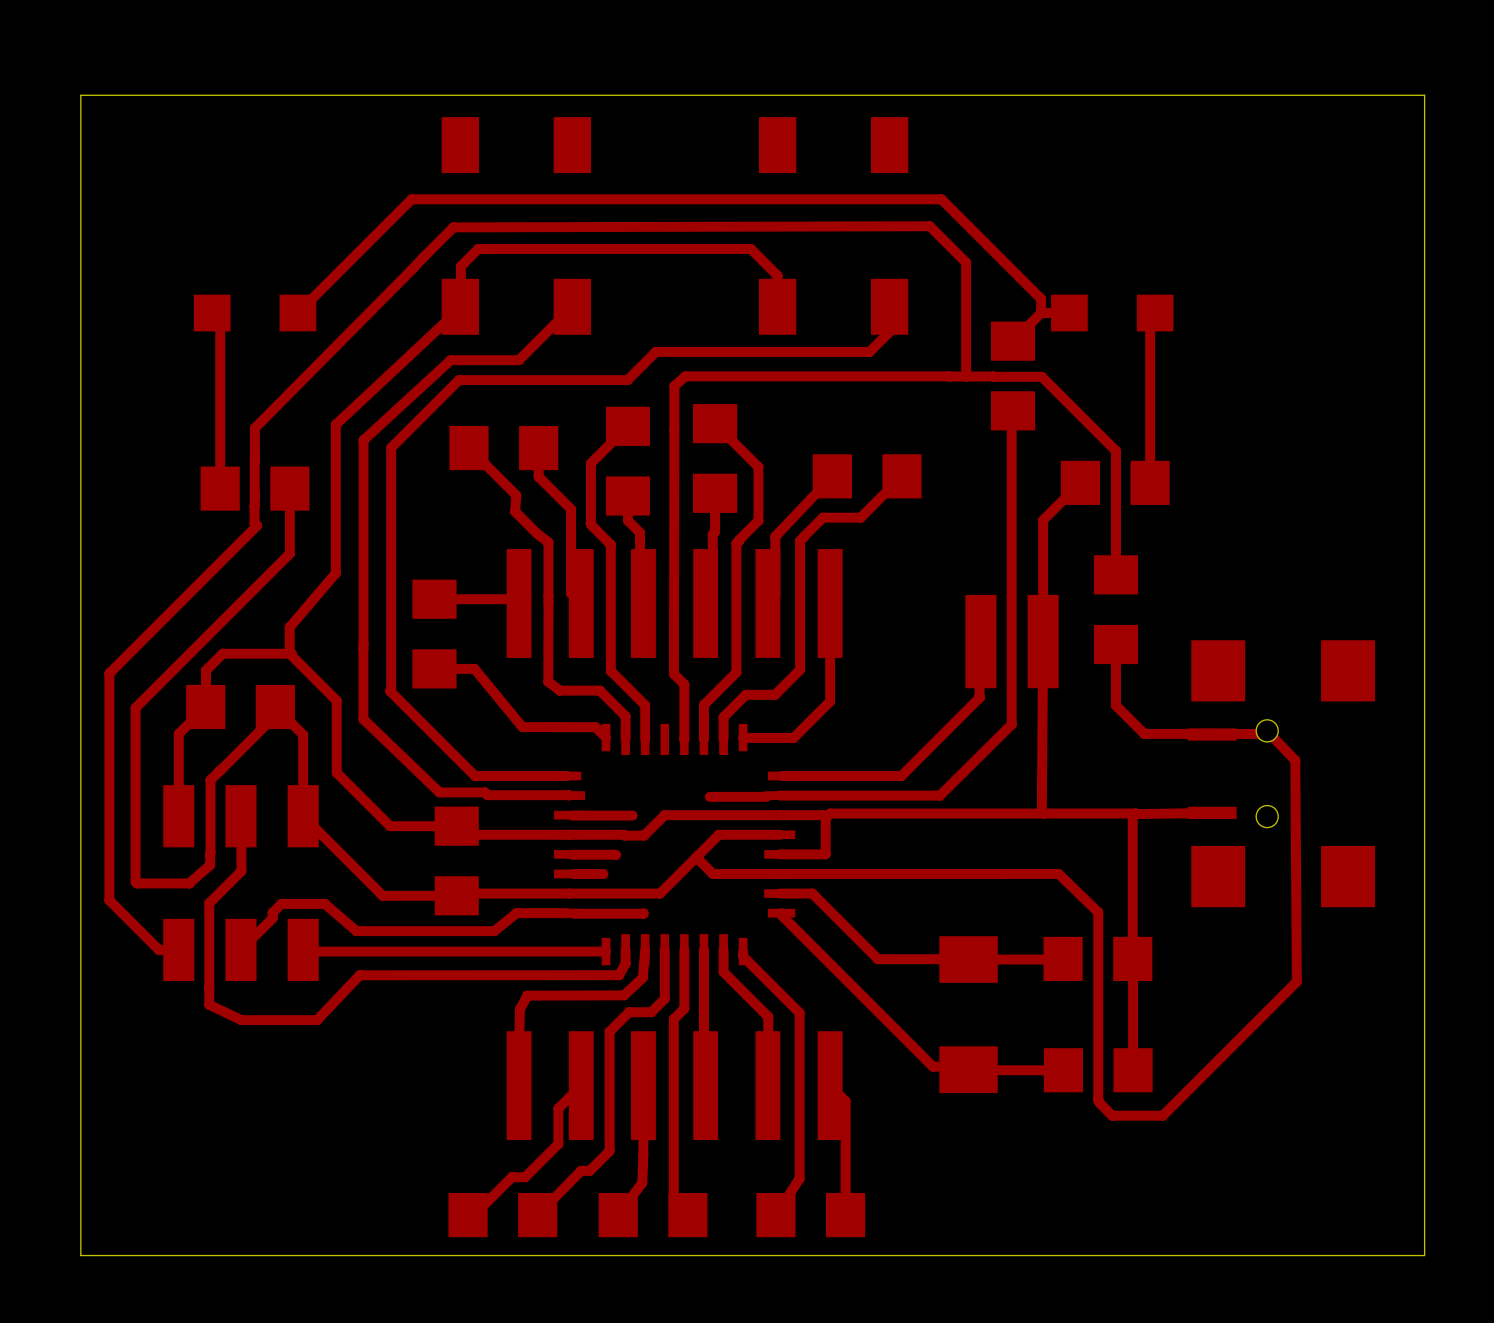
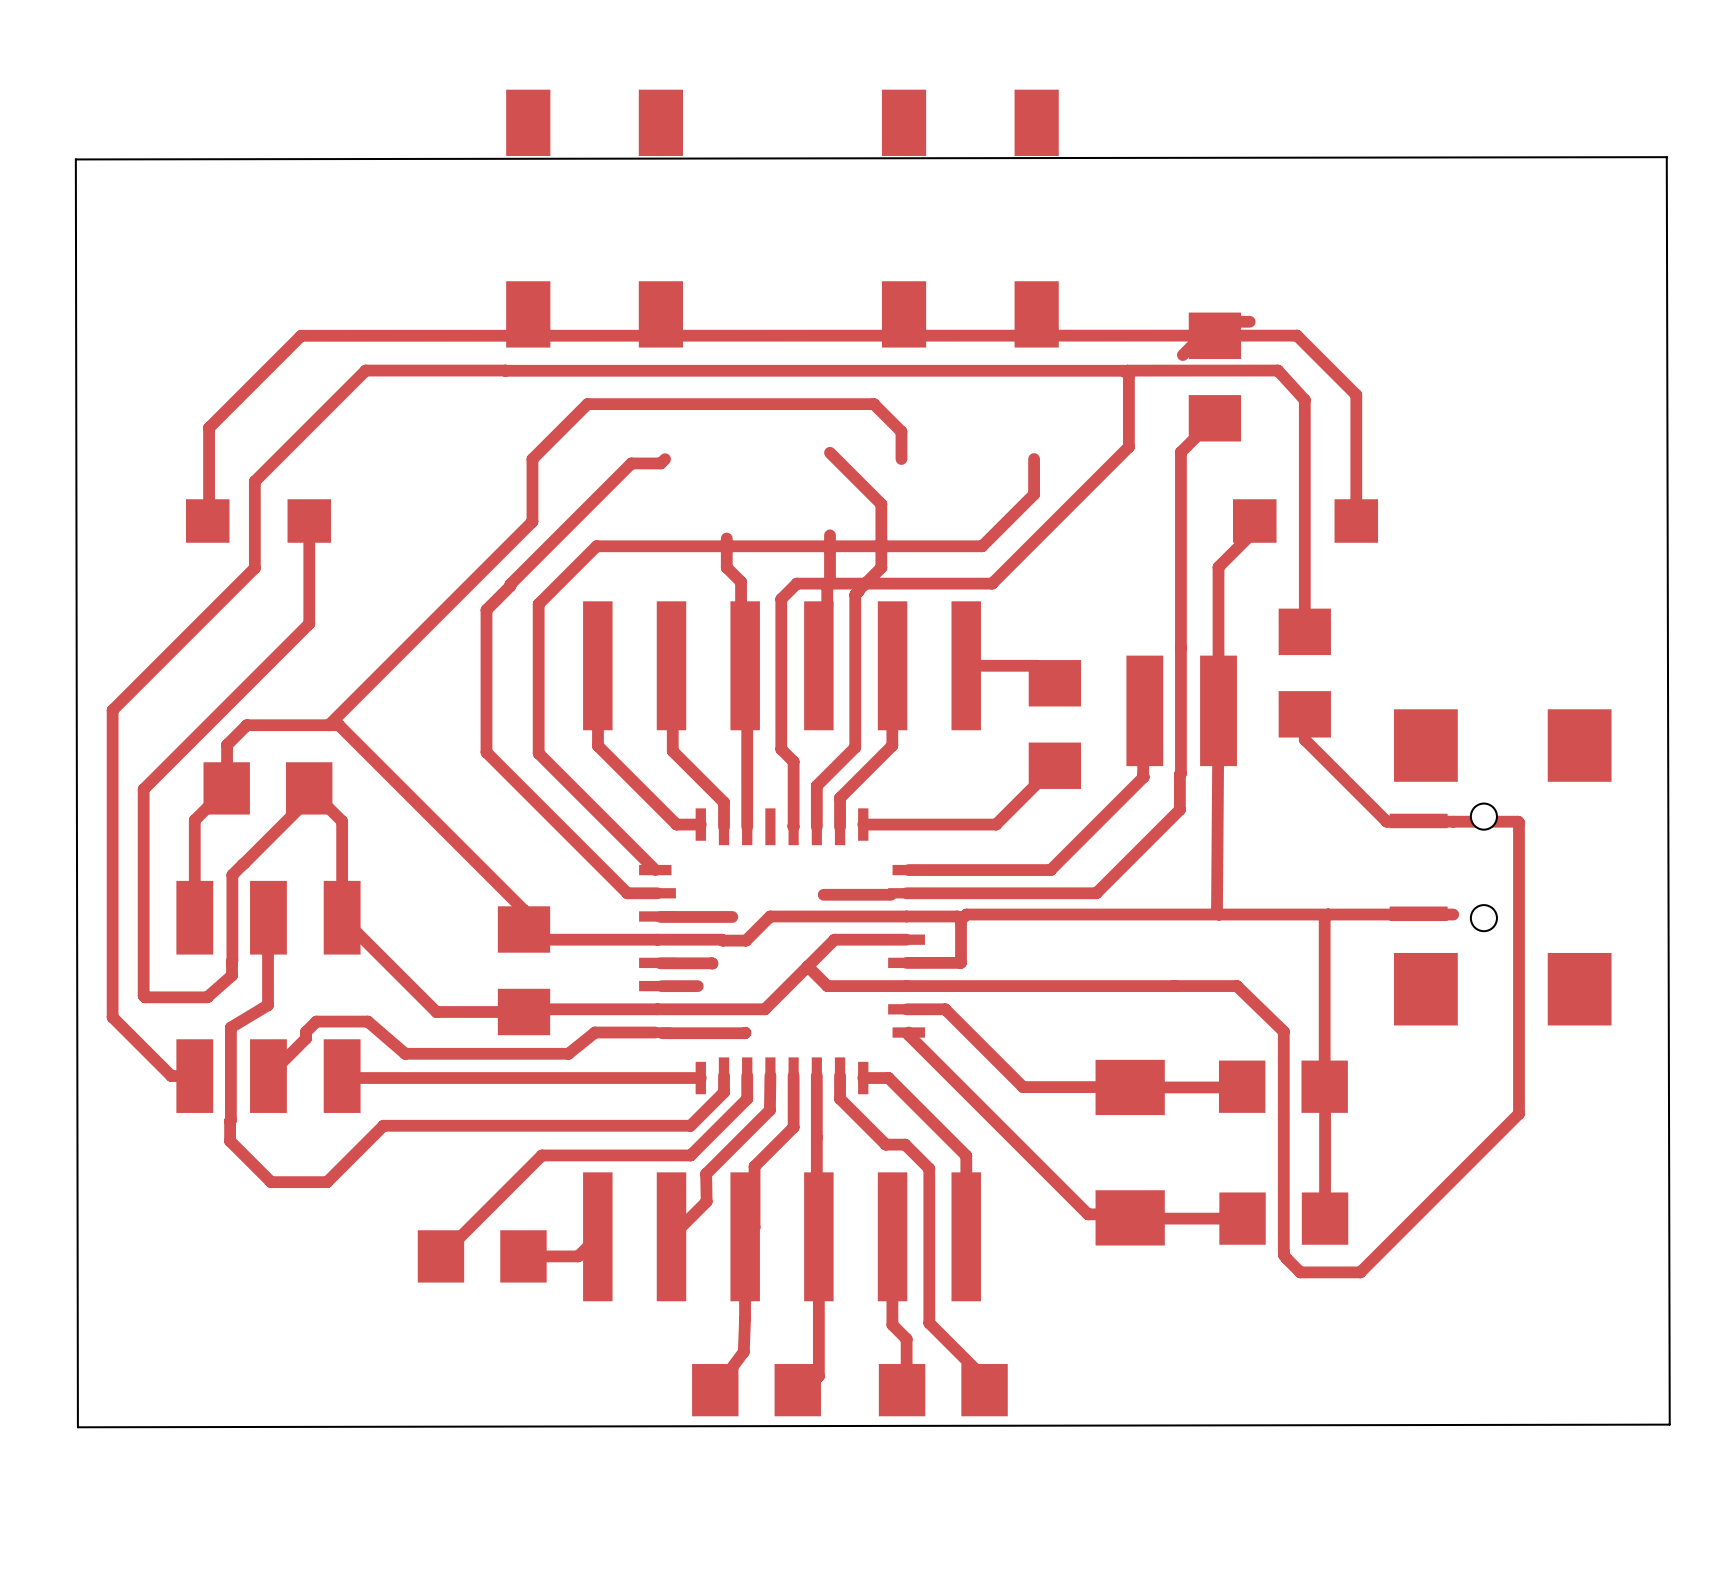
board edge: (1424, 95) (80, 95) (80, 1255) (1424, 1255) (1424, 95) -> (1666, 157) (1669, 1424) (77, 1427) (75, 159) (1666, 157)
top track: (572, 306) (518, 360) (450, 360) (363, 440) (363, 719) (439, 792) (484, 792) (487, 795) (569, 795) -> (665, 459) (660, 463) (631, 463) (486, 610) (486, 752) (627, 893) (657, 893)
top track: (777, 306) (777, 275) (750, 248) (478, 248) (460, 266) (460, 307) (458, 310) -> none
top track: (889, 306) (889, 331) (869, 351) (655, 351) (627, 380) (458, 380) (391, 447) (390, 691) (474, 775) (567, 775) -> (1034, 459) (1034, 494) (982, 546) (596, 546) (538, 604) (538, 753) (655, 870)
top track: (458, 310) (335, 424) (335, 573) (289, 627) (289, 653) (336, 700) (336, 772) (390, 826) (456, 826) (458, 821) -> none
top track: (212, 313) (220, 321) (220, 488) (207, 477) -> none
part: (255, 313) -> none
top track: (1041, 313) (1041, 298) (941, 199) (411, 199) (297, 313) -> none
part: (1112, 313) -> none
top track: (1155, 313) (1150, 318) (1150, 482) -> none
top track: none -> (505, 370) (1124, 370) (1128, 375)
top track: (966, 376) (966, 262) (929, 226) (453, 227) (254, 428) (254, 506) -> none
top track: (993, 376) (685, 376) (674, 386) (673, 674) -> (1128, 375) (1128, 446) (992, 583) (796, 583) (781, 599) (781, 749)
top track: (993, 376) (1041, 376) (1115, 450) -> (1128, 375) (1127, 370) (1277, 370) (1304, 400) (1304, 485)
part position: (1013, 376) -> (1214, 377)
top track: (1013, 410) (1011, 724) (940, 795) -> (1214, 418) (1180, 452) (1179, 809) (1096, 893)
top track: (627, 426) (590, 463) (590, 523) (610, 544) (610, 670) (645, 705) -> (745, 665) (747, 667) (747, 786)
top track: none -> (901, 459) (901, 431) (873, 404) (587, 404) (532, 459) (532, 521) (328, 725) (338, 725) (523, 910) (523, 929)
top track: (468, 448) (516, 495) (515, 511) (548, 542) (548, 681) (559, 690) (599, 690) (625, 716) (625, 718) -> (671, 665) (672, 751) (724, 802)
part: (503, 448) -> none
top track: (538, 448) (538, 476) (571, 509) (571, 593) (581, 603) -> none
part: (715, 458) -> none
part footprint: [1060, 460, 1170, 505] -> [1233, 499, 1379, 543]
part: (627, 461) -> none
part footprint: [200, 466, 310, 511] -> [185, 499, 332, 543]
top track: (832, 476) (775, 536) (775, 596) (767, 603) -> none
part: (867, 476) -> none
top track: (902, 476) (860, 517) (822, 517) (800, 540) (800, 669) (775, 694) (745, 694) (723, 717) -> (892, 666) (892, 745) (840, 797) (840, 800)
top track: none -> (1356, 520) (1356, 394) (1296, 335) (301, 335) (209, 427) (207, 520)
top track: (275, 497) (289, 488) (289, 553) (275, 568) -> (309, 520) (309, 623)
top track: (254, 506) (254, 523) (257, 525) (109, 673) -> (505, 370) (365, 370) (254, 481) (254, 568) (112, 710) (112, 748)
top track: (434, 599) (514, 599) (519, 603) -> none
top track: (830, 603) (830, 701) (793, 737) (743, 737) -> (1054, 765) (996, 824) (863, 824)
top track: none -> (966, 665) (1037, 665) (1054, 683)
part: (434, 634) -> none
part: none -> (1054, 724)
top track: (1115, 665) (1115, 705) (1144, 733) (1270, 733) (1295, 760) -> none
top track: (434, 668) (474, 668) (522, 727) (595, 727) (606, 737) -> (597, 665) (597, 745) (676, 824) (700, 824)
top track: (1295, 760) (1296, 981) -> (1304, 739) (1386, 821) (1518, 822) (1518, 1113)
top track: (1212, 812) (1135, 813) -> (1453, 914) (1328, 914)
top track: (240, 816) (241, 871) (209, 903) (209, 908) -> (268, 917) (268, 1005) (230, 1027)
top track: (645, 949) (642, 977) (624, 995) (527, 995) (519, 1009) (519, 1085) -> (747, 1075) (747, 1098) (690, 1155) (541, 1155) (440, 1256)
top track: (664, 949) (664, 998) (651, 1012) (629, 1012) (609, 1031) (609, 1151) (589, 1170) (581, 1170) (537, 1215) -> (770, 1075) (769, 1110) (706, 1173) (706, 1201) (671, 1236)
top track: (743, 951) (743, 956) (799, 1012) (799, 1178) (775, 1215) -> (863, 1078) (888, 1078) (966, 1155) (966, 1236)
top track: (625, 963) (619, 975) (359, 975) (317, 1020) (241, 1020) (209, 1004) (209, 987) -> (724, 1092) (690, 1125) (383, 1125) (327, 1182) (271, 1182) (230, 1141) (230, 1120)
top track: (723, 969) (723, 972) (768, 1016) (767, 1085) -> (840, 1098) (885, 1144) (905, 1144) (929, 1168) (929, 1323) (989, 1382)
top track: (684, 993) (684, 1008) (673, 1019) (673, 1201) (687, 1215) -> (793, 1127) (754, 1166) (754, 1227) (745, 1236)
top track: none -> (597, 1236) (578, 1256) (523, 1256)
top track: (581, 1085) (558, 1108) (558, 1143) (525, 1177) (511, 1177) (474, 1214) (468, 1215) -> none
top track: none -> (818, 1236) (818, 1376) (810, 1384)
top track: none -> (892, 1236) (892, 1324) (906, 1339) (906, 1382)
top track: (830, 1085) (845, 1101) (845, 1215) -> none
part position: (502, 1215) -> (482, 1256)

